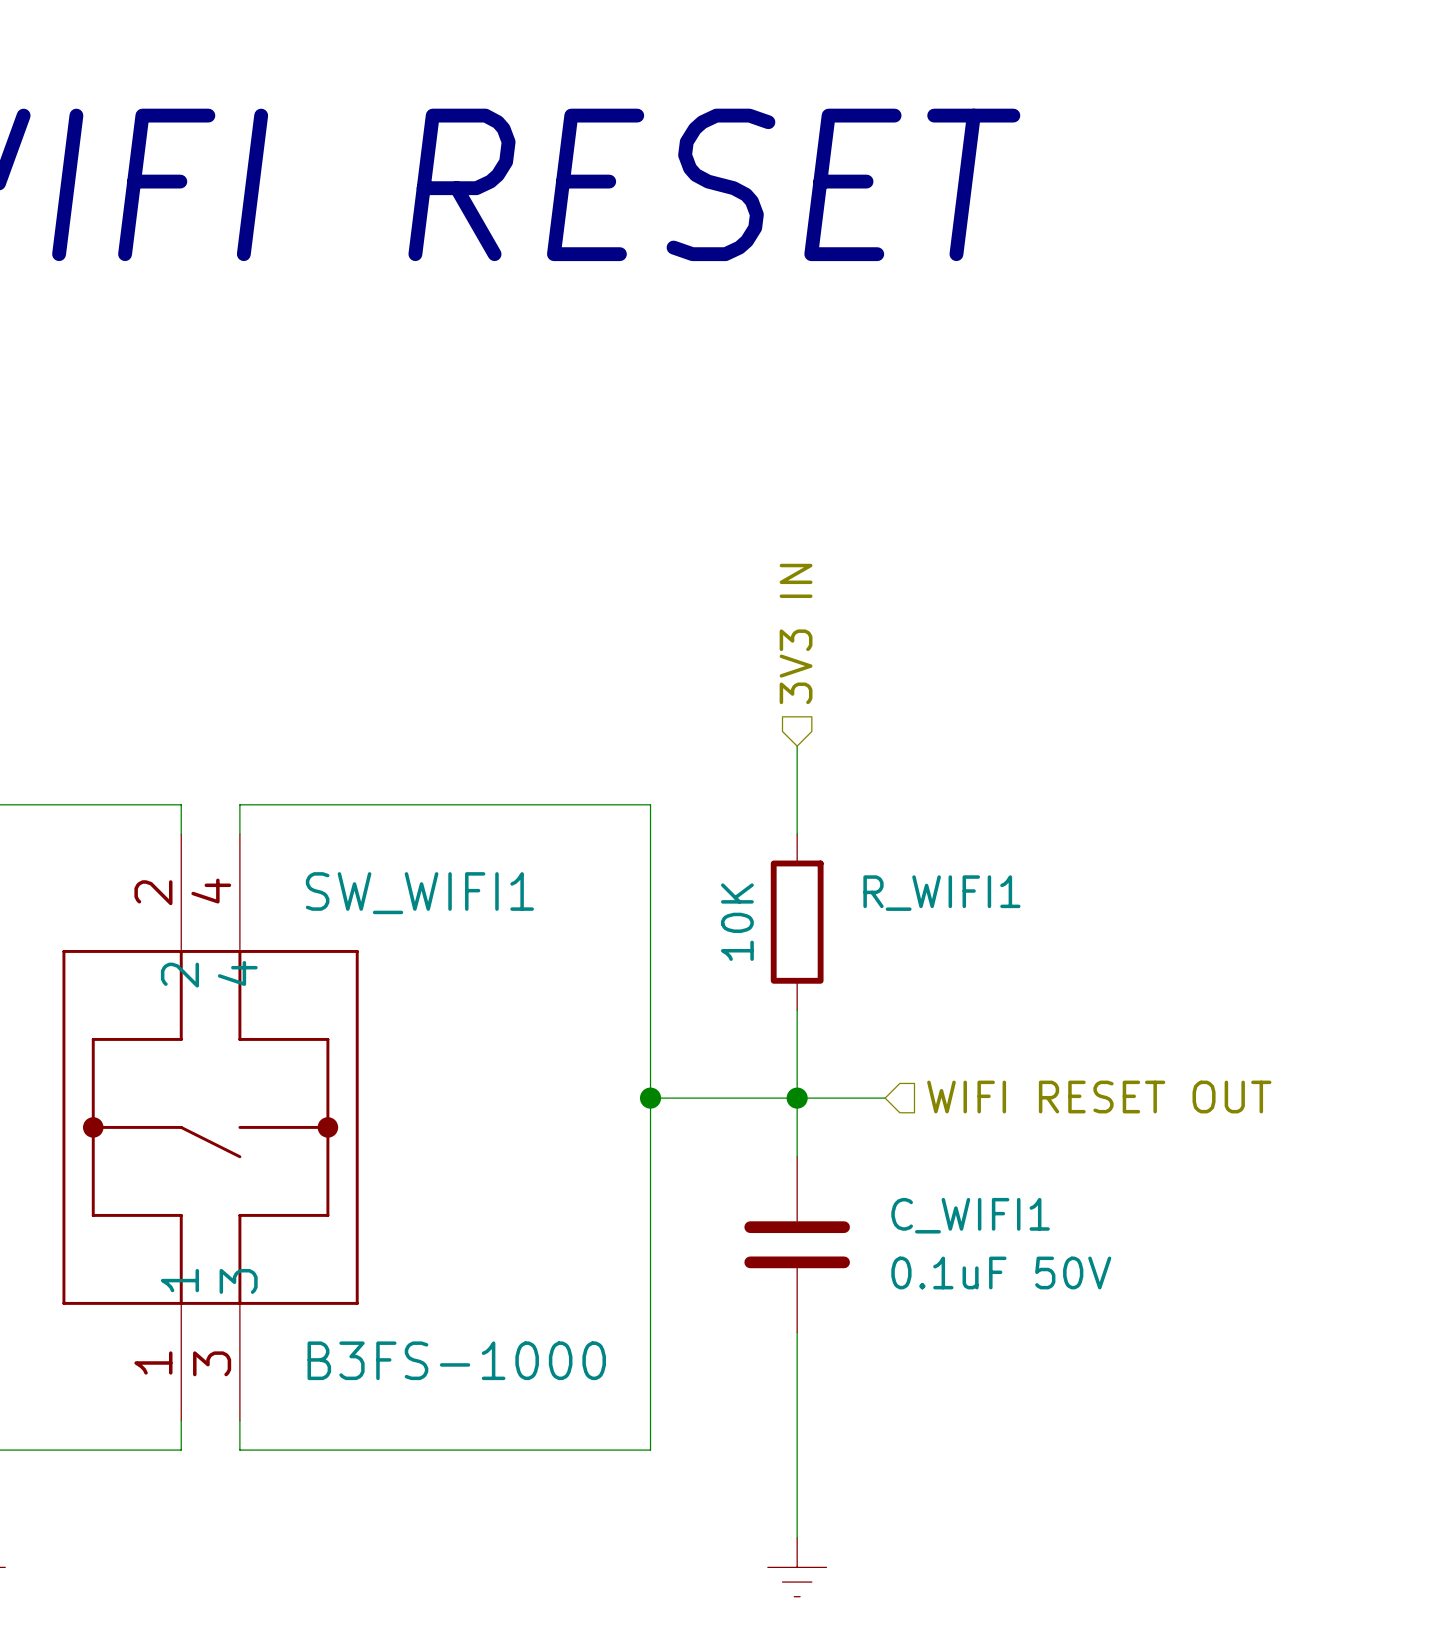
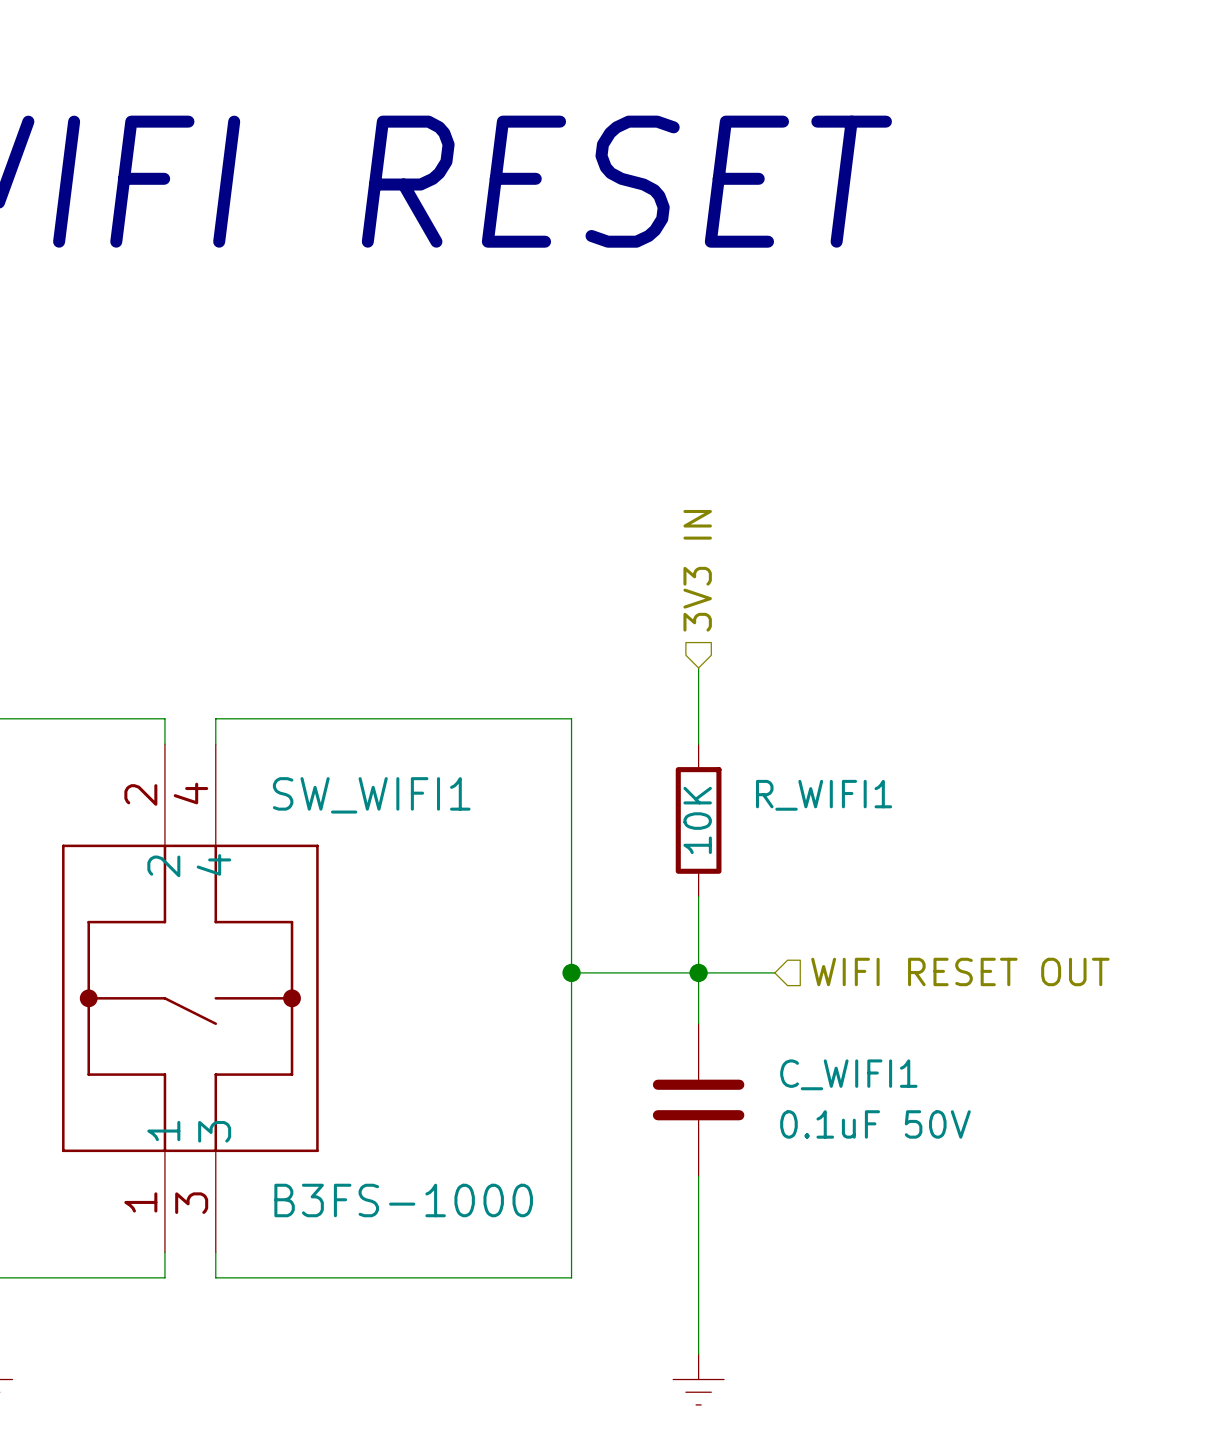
R_WIFI1 value position: 10K (737, 922) -> 10K (697, 820)

